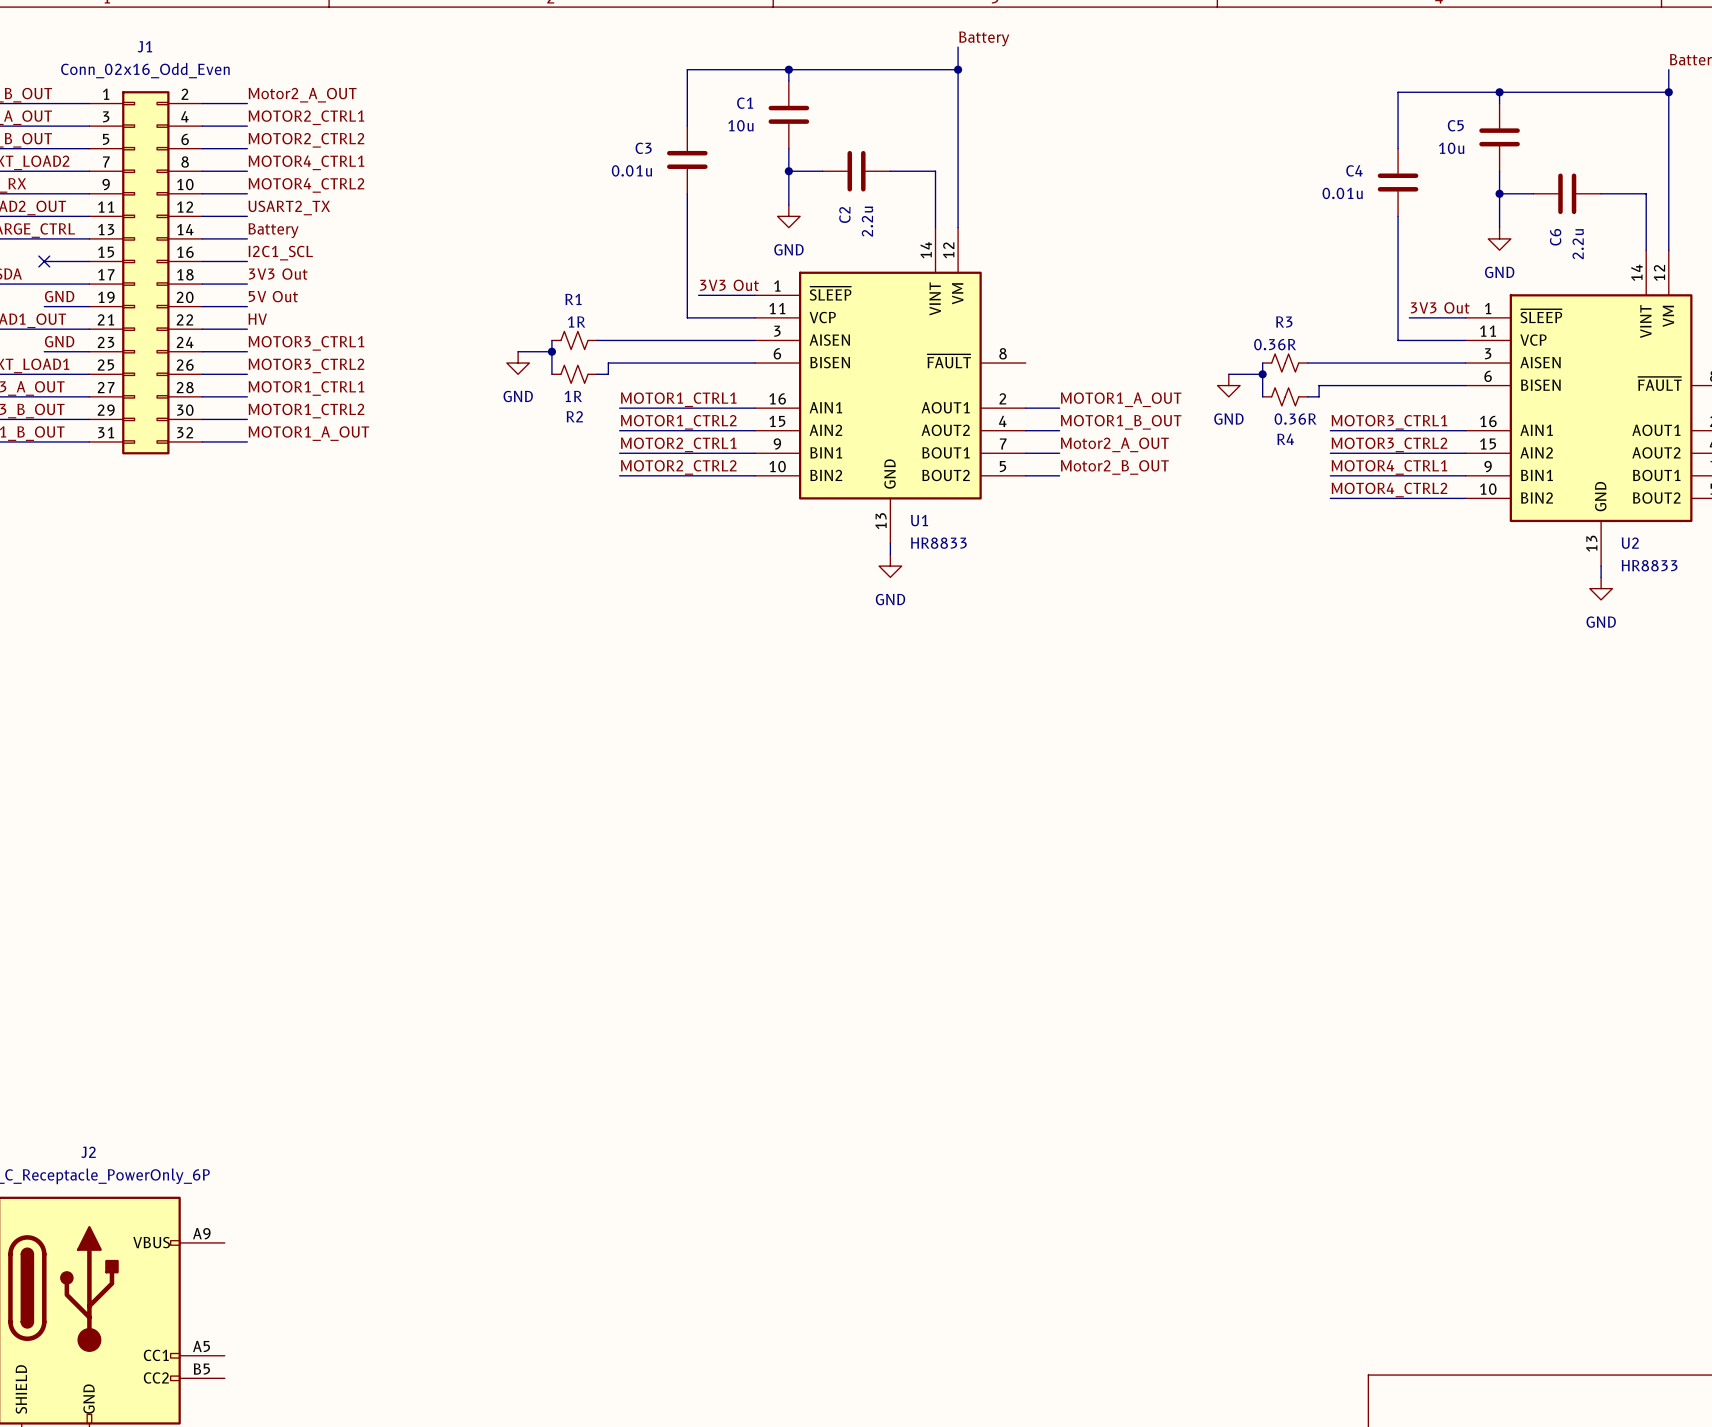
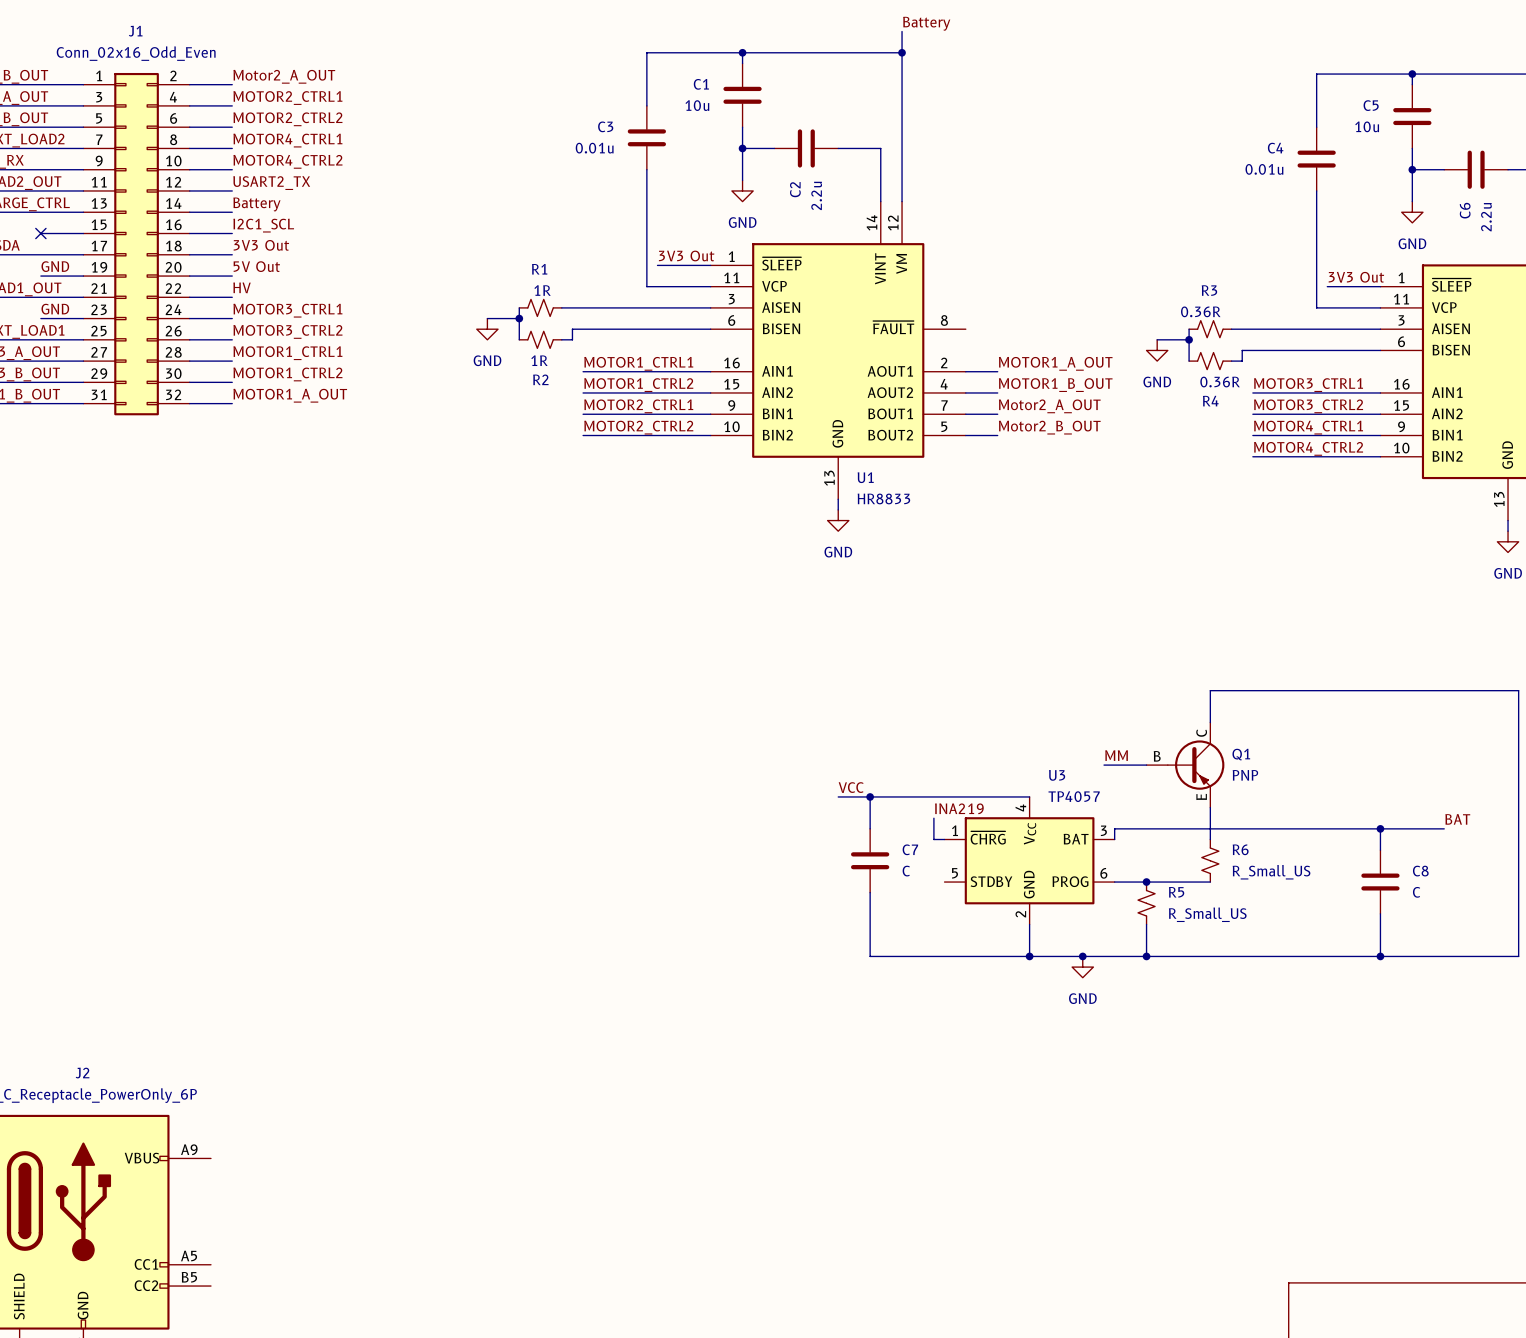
wire: none -> (1210, 722) (1210, 690) (1518, 690) (1518, 956) (870, 956) (870, 892)
label: none -> MM (1116, 755)
wire: none -> (1104, 765) (1146, 765)
Q1: none -> PNP (1185, 765)
label: none -> VCC (851, 787)
wire: none -> (838, 796) (1029, 796)
wire: none -> (870, 796) (870, 828)
junction: none -> (870, 796)
wire: none -> (1210, 807) (1210, 839)
label: none -> INA219 (959, 808)
wire: none -> (933, 818) (933, 839) (944, 839)
label: none -> BAT (1457, 819)
wire: none -> (1380, 828) (1380, 850)
junction: none -> (1380, 828)
wire: none -> (1444, 828) (1114, 828) (1114, 839)
C7: none -> C (870, 860)
U3: none -> TP4057 (1029, 860)
R6: none -> R_Small_US (1210, 860)
wire: none -> (1114, 882) (1210, 882)
junction: none -> (1146, 882)
C8: none -> C (1380, 882)
R5: none -> R_Small_US (1146, 903)
wire: none -> (1380, 913) (1380, 956)
wire: none -> (1029, 924) (1029, 956)
wire: none -> (1146, 924) (1146, 956)
junction: none -> (1029, 956)
junction: none -> (1082, 956)
junction: none -> (1146, 956)
junction: none -> (1380, 956)
power symbol: none -> GND (1082, 967)

